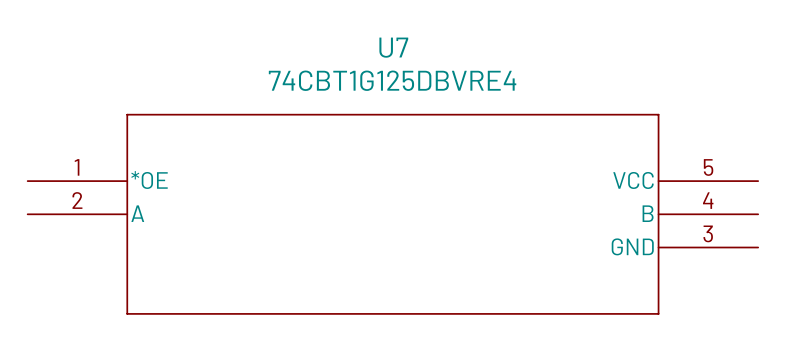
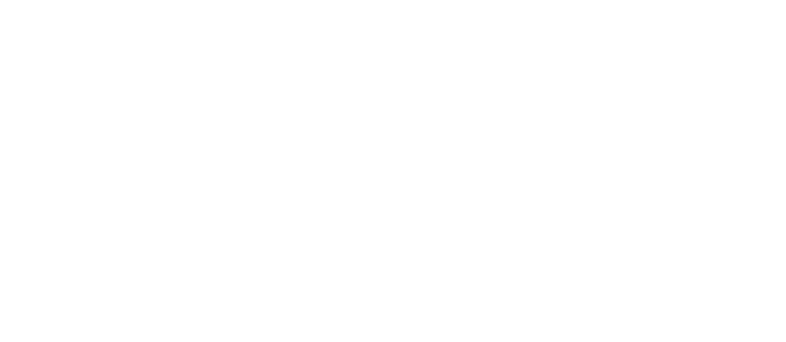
U7: 74CBT1G125DBVRE4 (392, 214) -> none

